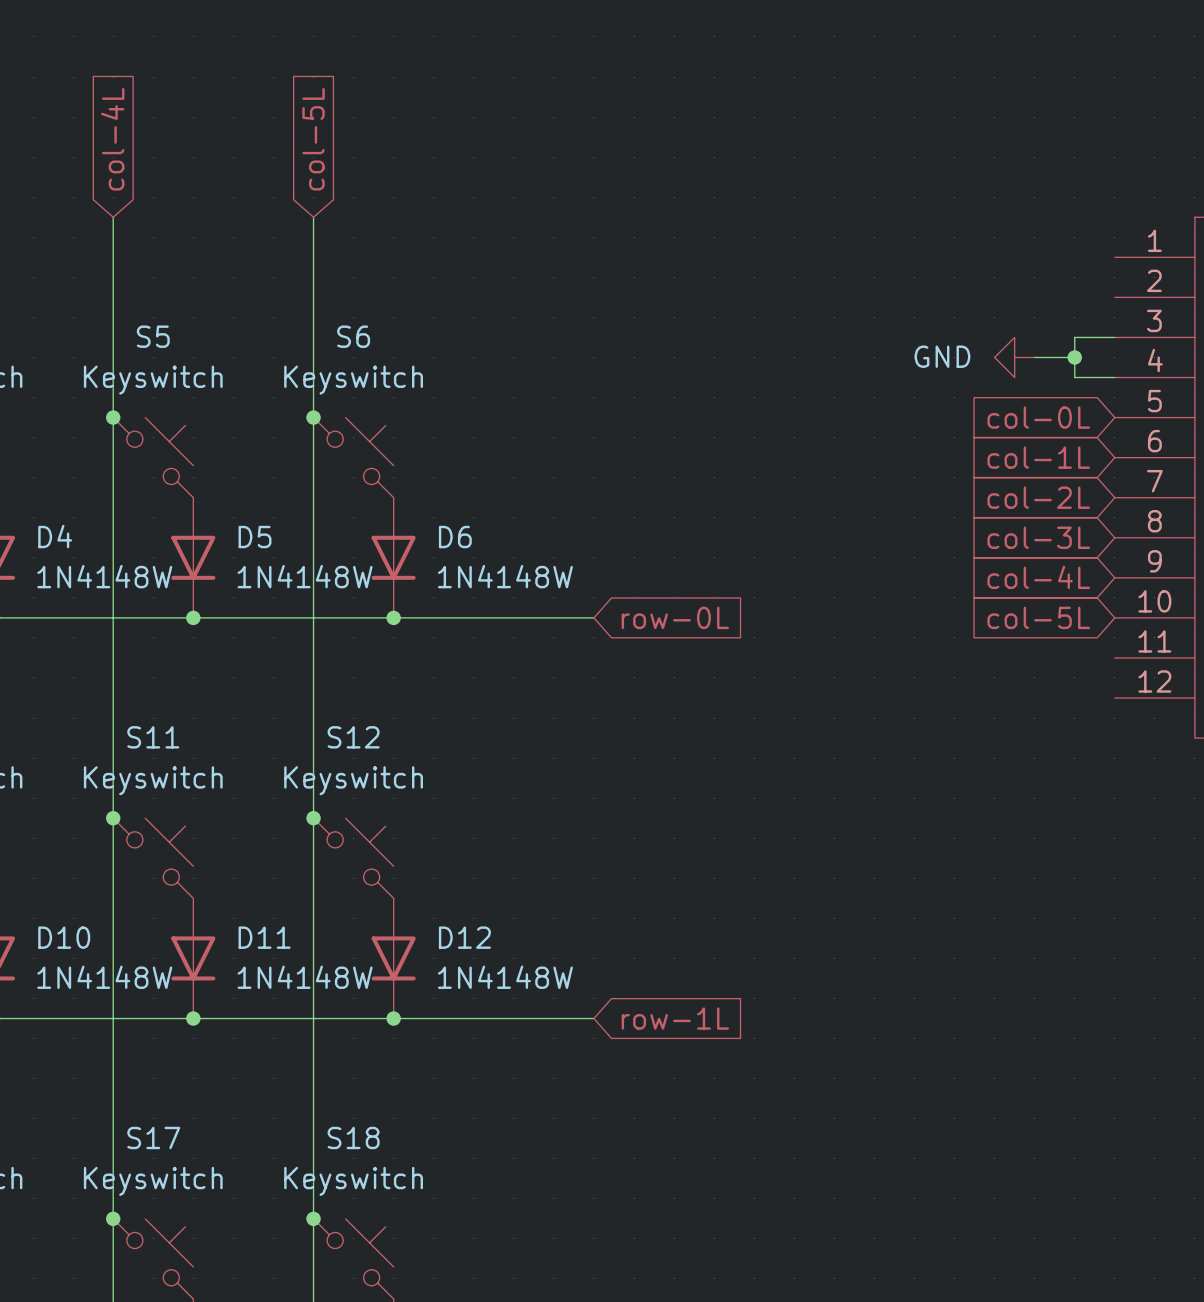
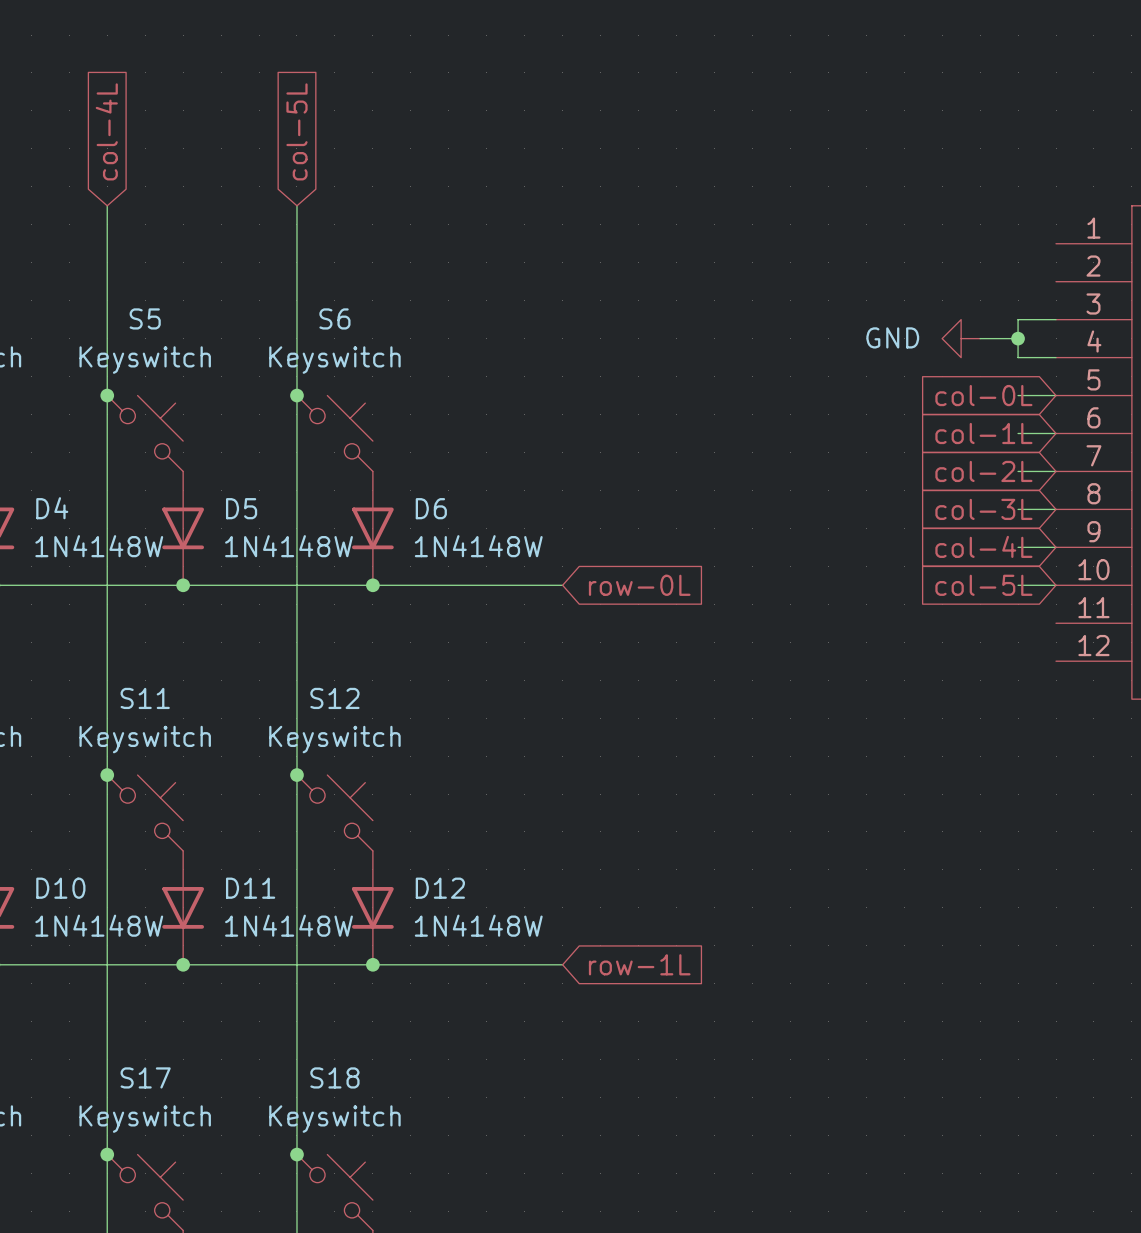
wire: none -> (1018, 395) (1056, 395)
wire: none -> (1018, 433) (1056, 433)
wire: none -> (1018, 471) (1056, 471)
wire: none -> (1018, 509) (1056, 509)
wire: none -> (1018, 547) (1056, 547)
wire: none -> (1018, 585) (1056, 585)

